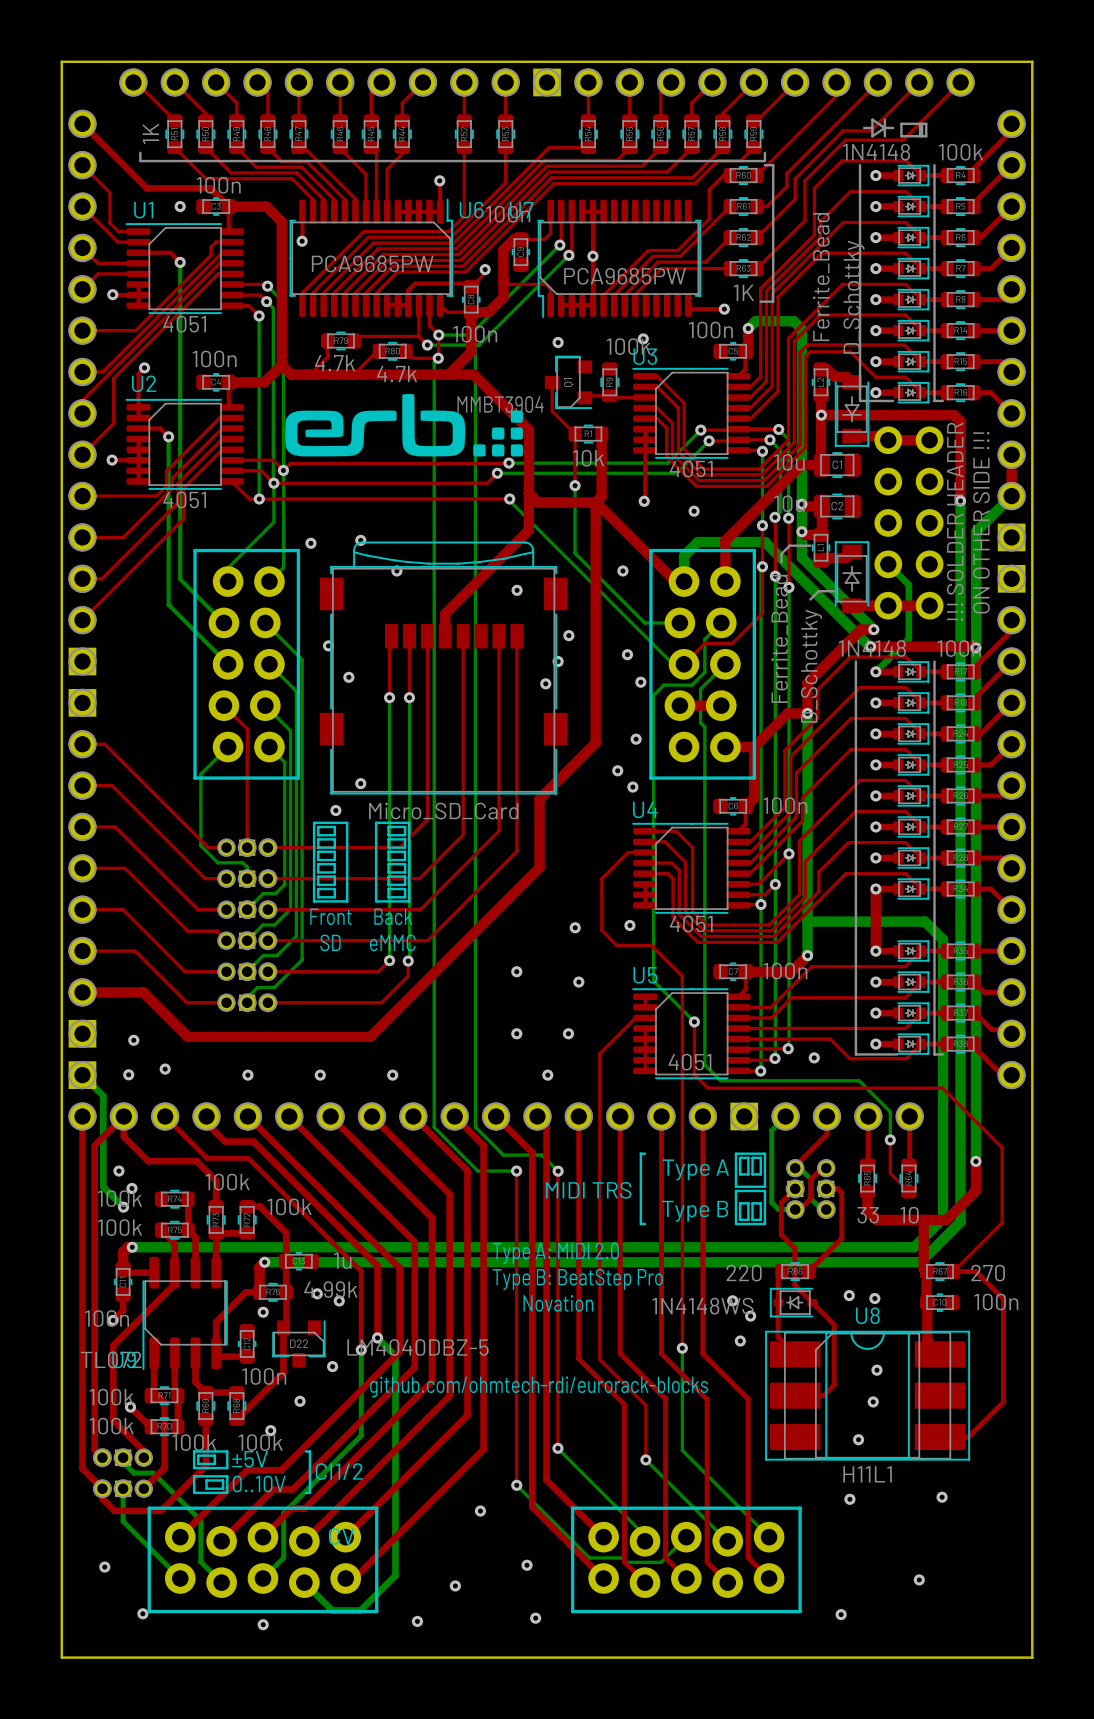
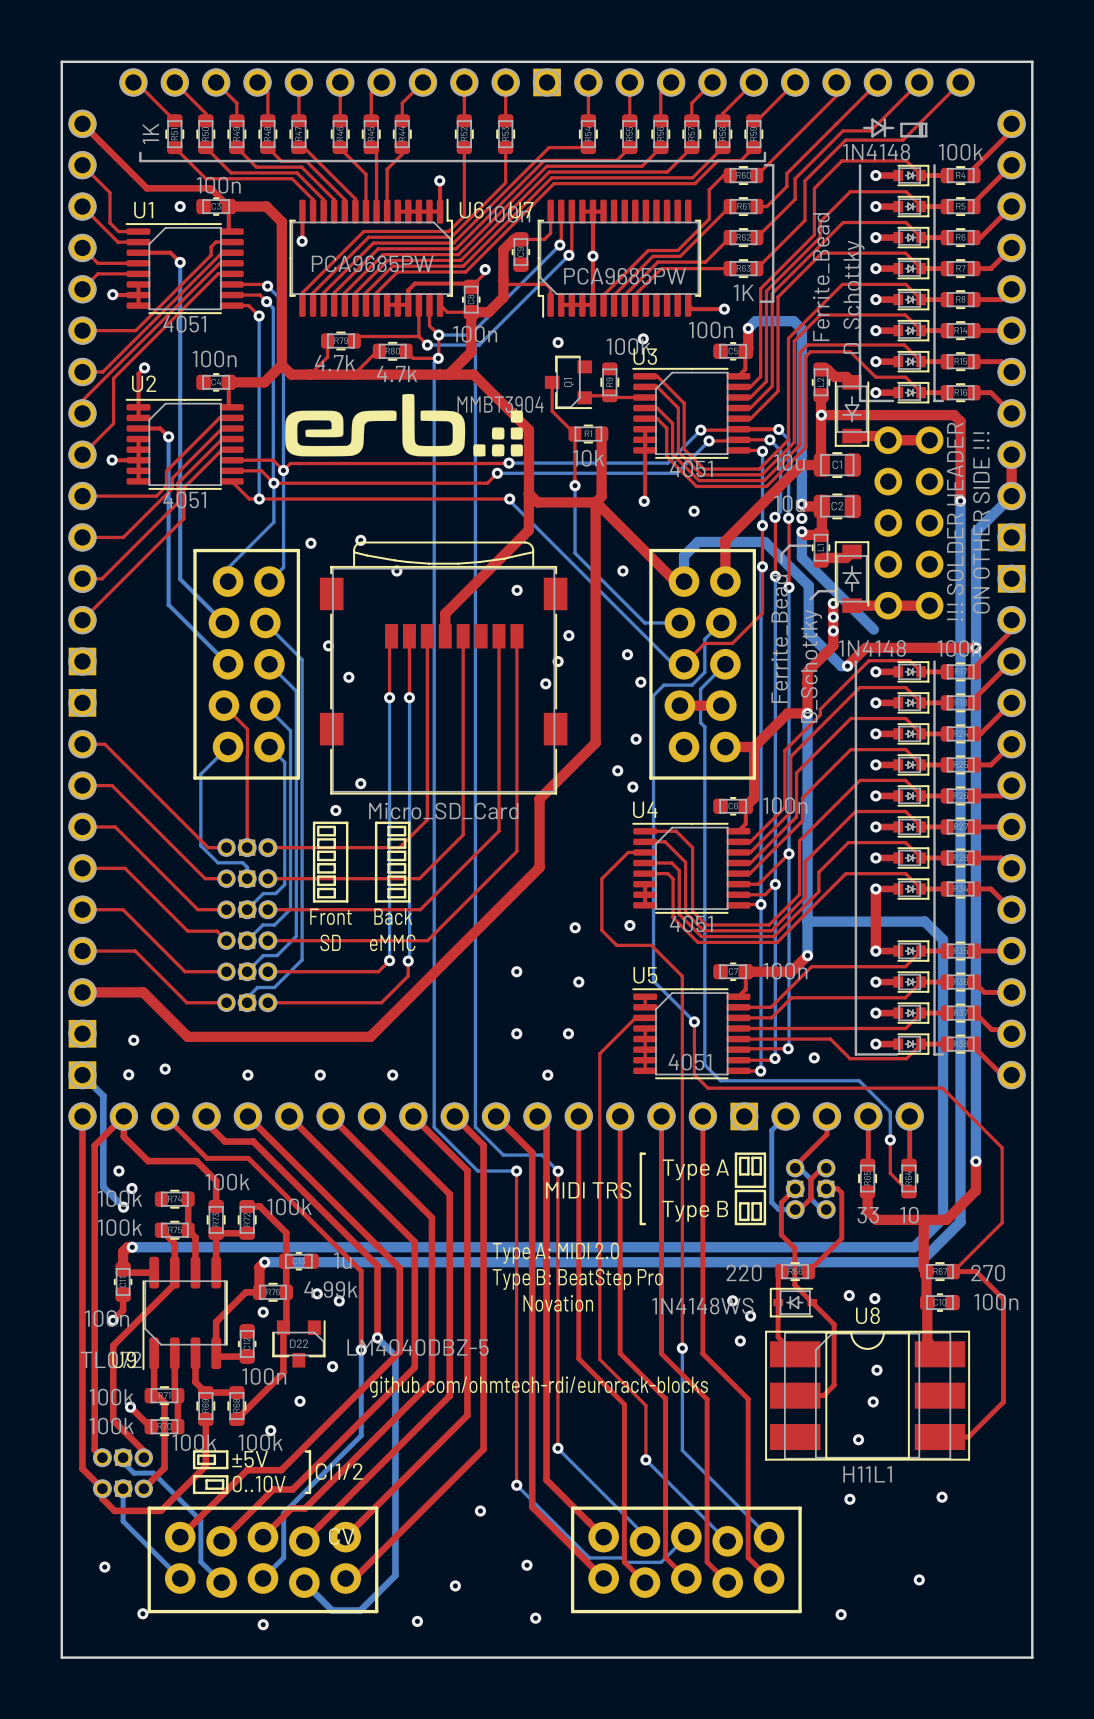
bottom track: (801, 504) (801, 531) -> none
via: none -> (801, 518)
bottom track: (888, 564) (908, 584) (908, 638) (875, 671) -> none
bottom track: (808, 585) (870, 646) -> (808, 585) (808, 633) (841, 666) (847, 666)
via: none -> (833, 603)
via: none -> (833, 617)
top track: (873, 629) (860, 629) (807, 682) -> (833, 603) (833, 645) (807, 671) (807, 682)
via: (873, 629) -> none
via: none -> (833, 630)
top track: (870, 646) (975, 647) -> (847, 666) (865, 647) (975, 647)
via: (870, 646) -> none
top track: (909, 660) (906, 656) (850, 656) (817, 690) (817, 718) -> (909, 660) (868, 660) (820, 709) (820, 715) (817, 718)
via: none -> (847, 666)

